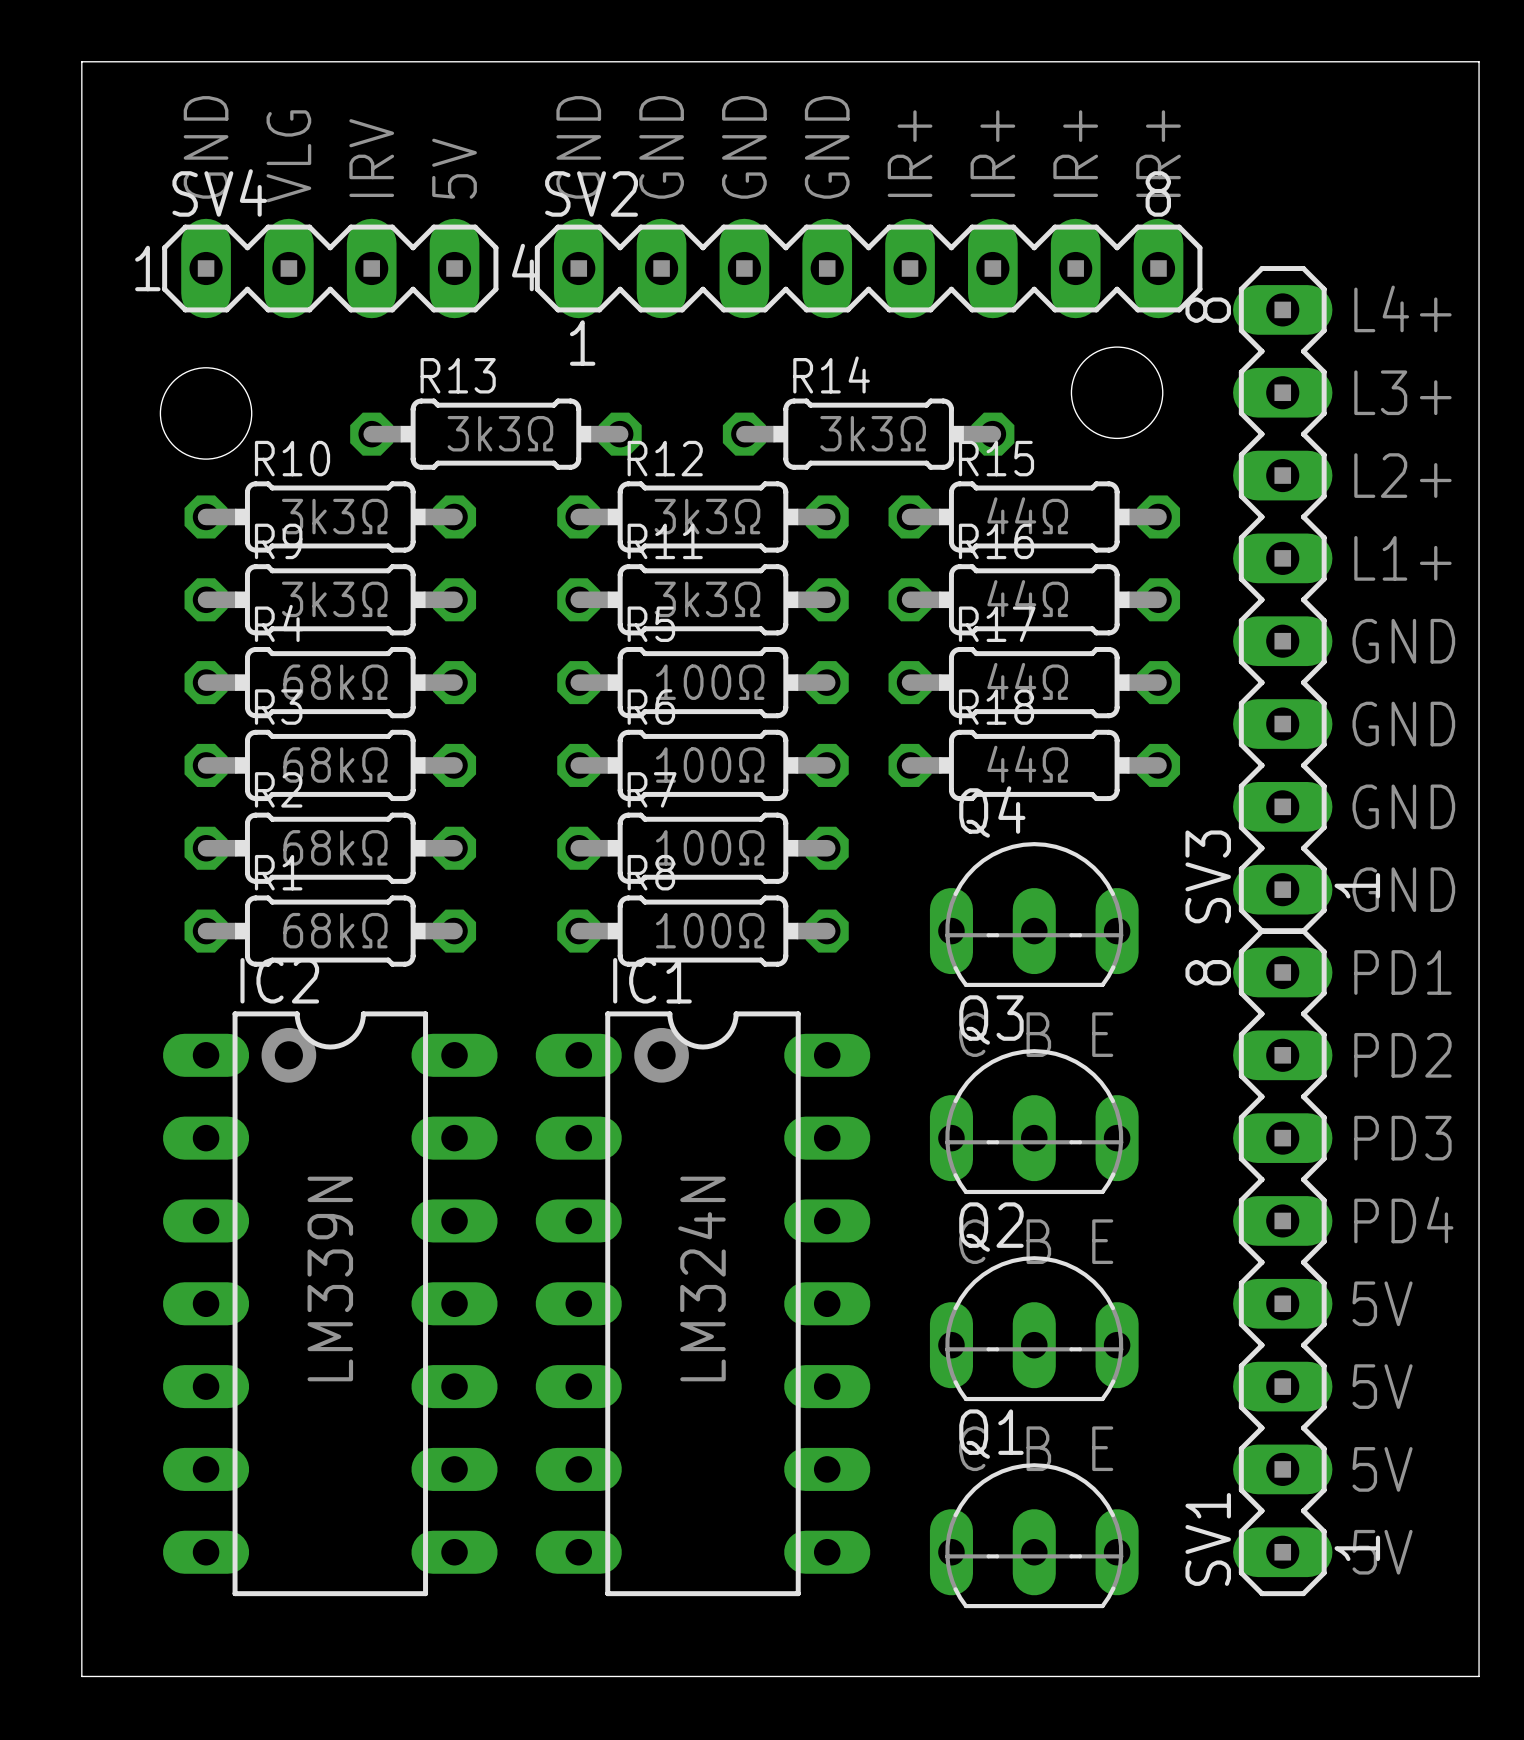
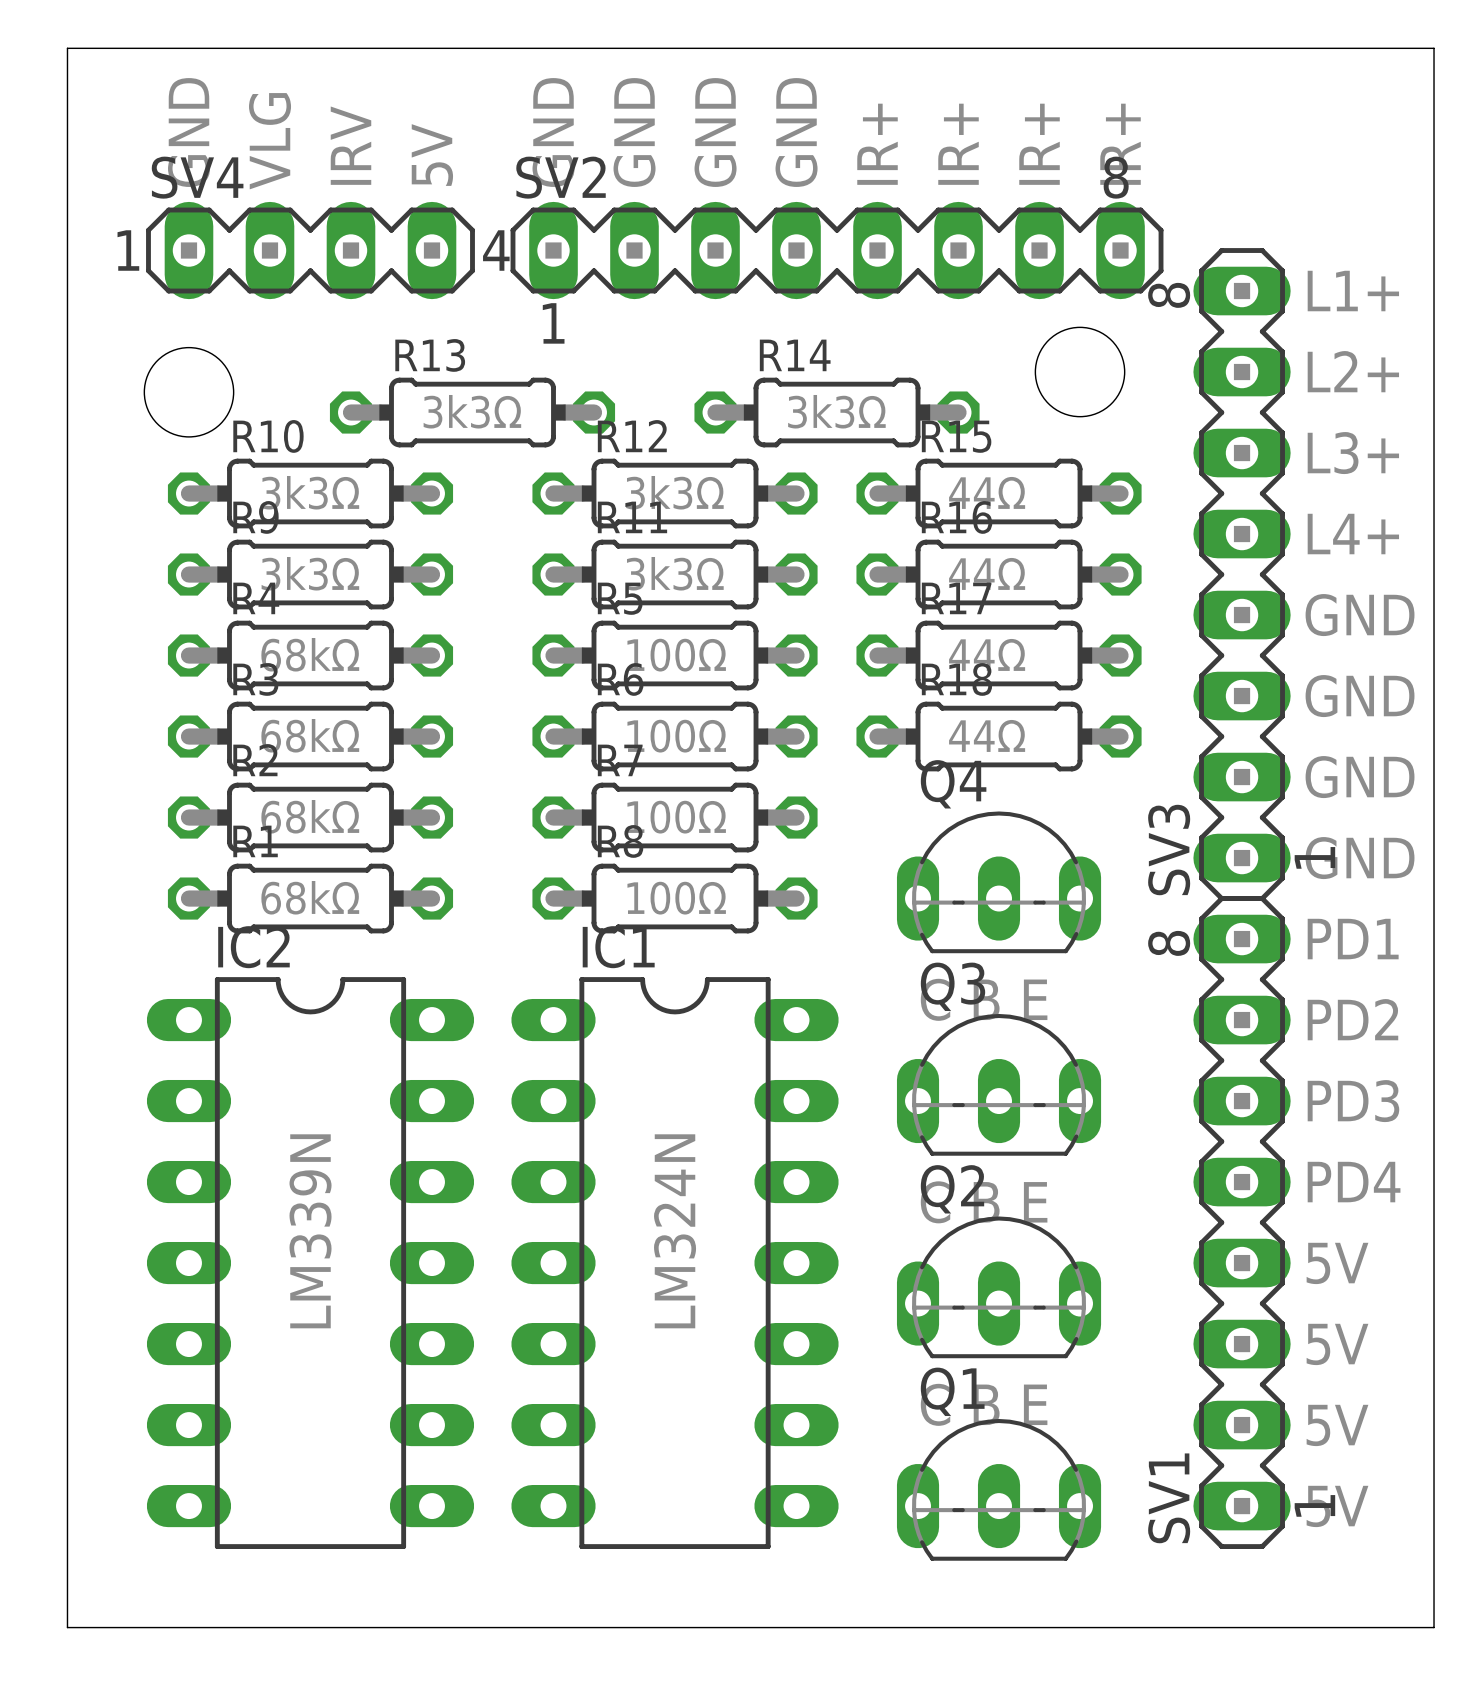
text: L4+ (1402, 308) -> L1+ (1353, 291)
text: L3+ (1402, 392) -> L2+ (1353, 371)
text: L2+ (1402, 475) -> L3+ (1353, 453)
text: L1+ (1402, 558) -> L4+ (1353, 534)
drawing: [261, 1027, 317, 1083] -> none
drawing: [634, 1027, 689, 1083] -> none

